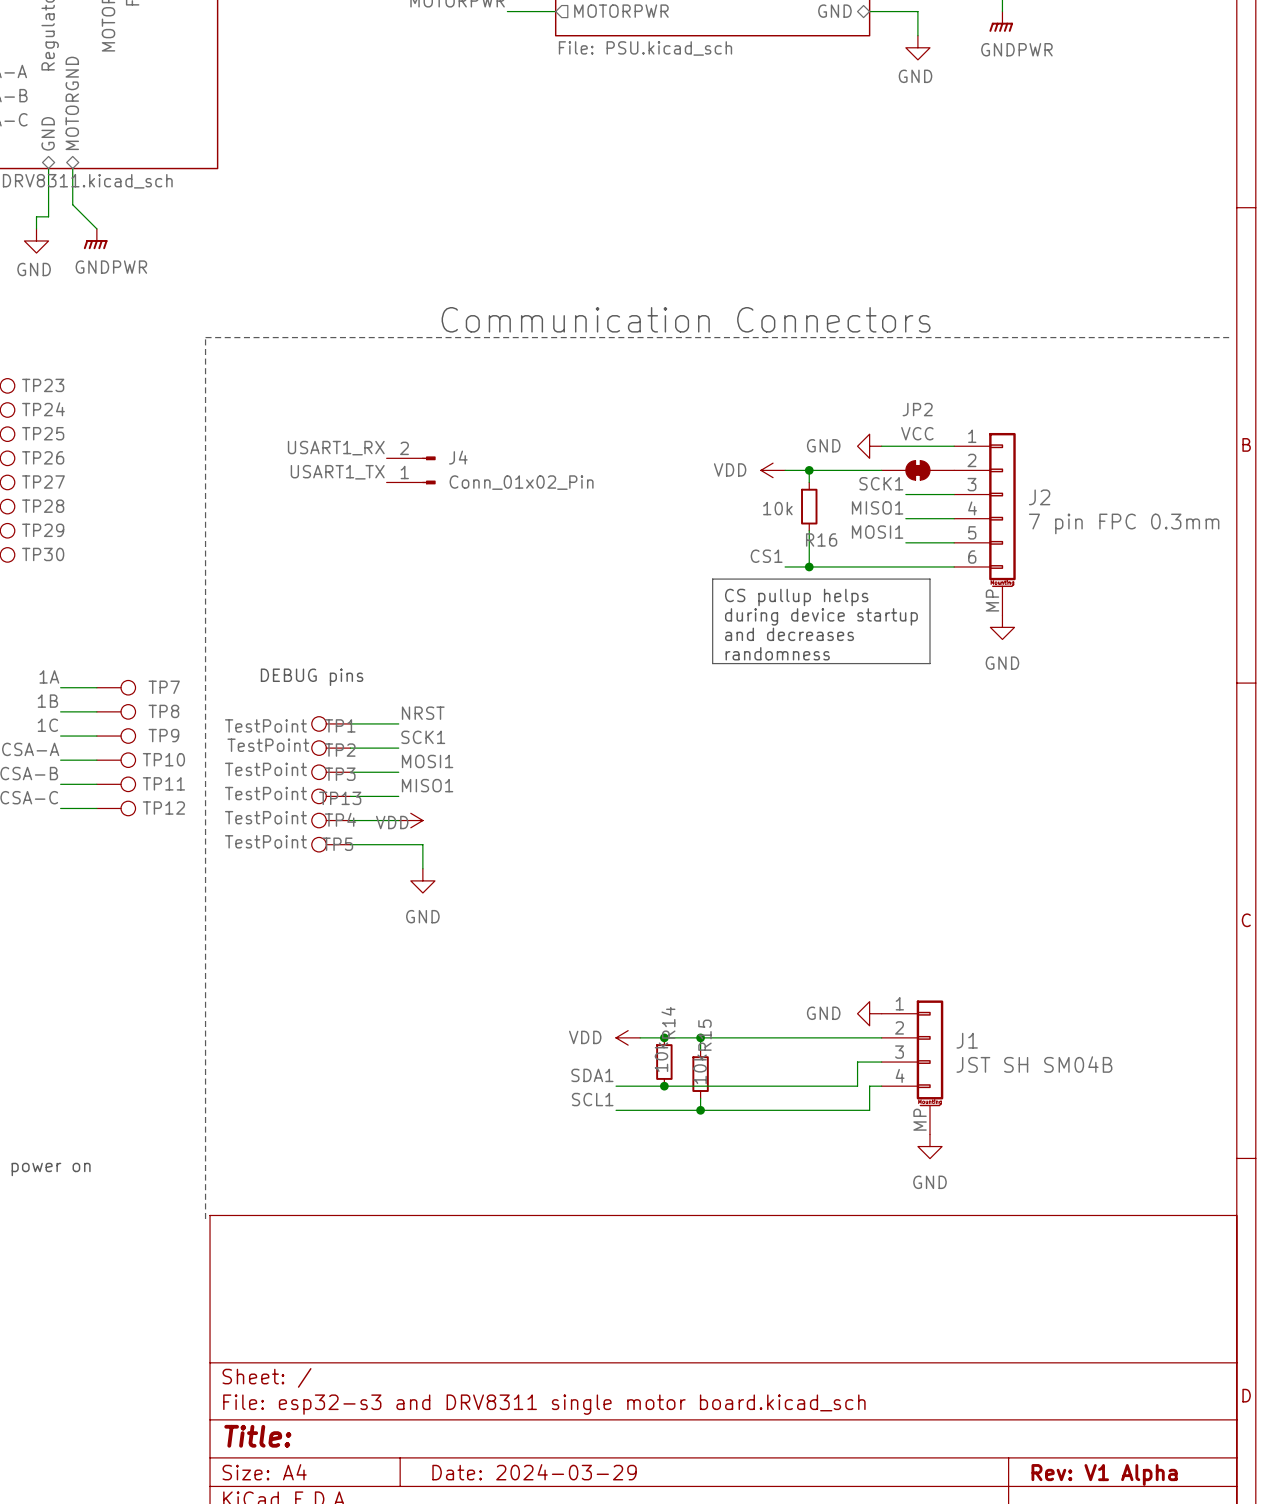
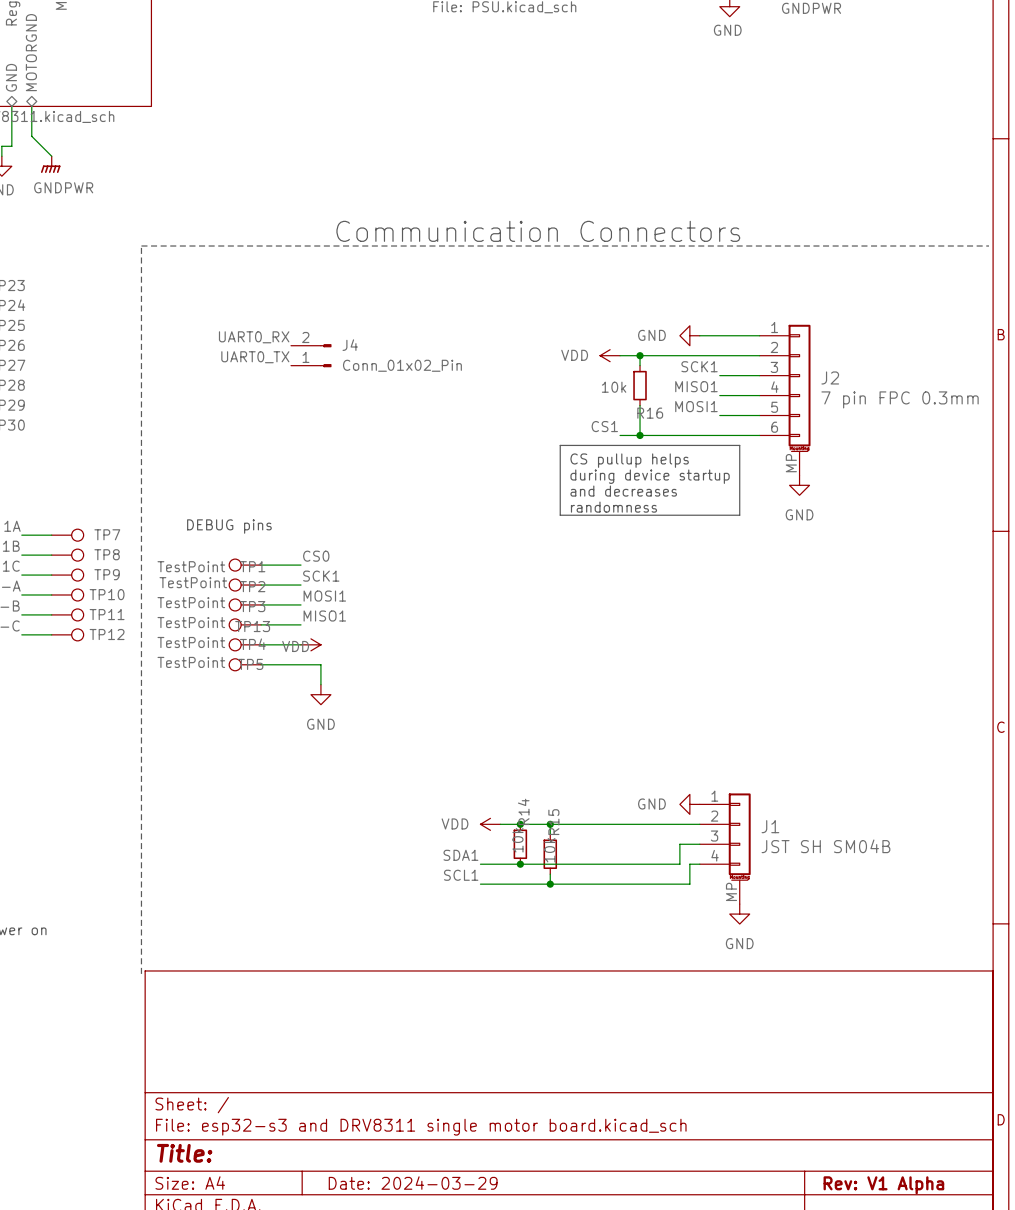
label: USART1_RX (336, 448) -> UART0_RX (254, 337)
JP2: VCC (917, 470) -> none
label: USART1_TX (337, 472) -> UART0_TX (255, 357)
label: NRST (423, 713) -> CS0 (316, 556)

